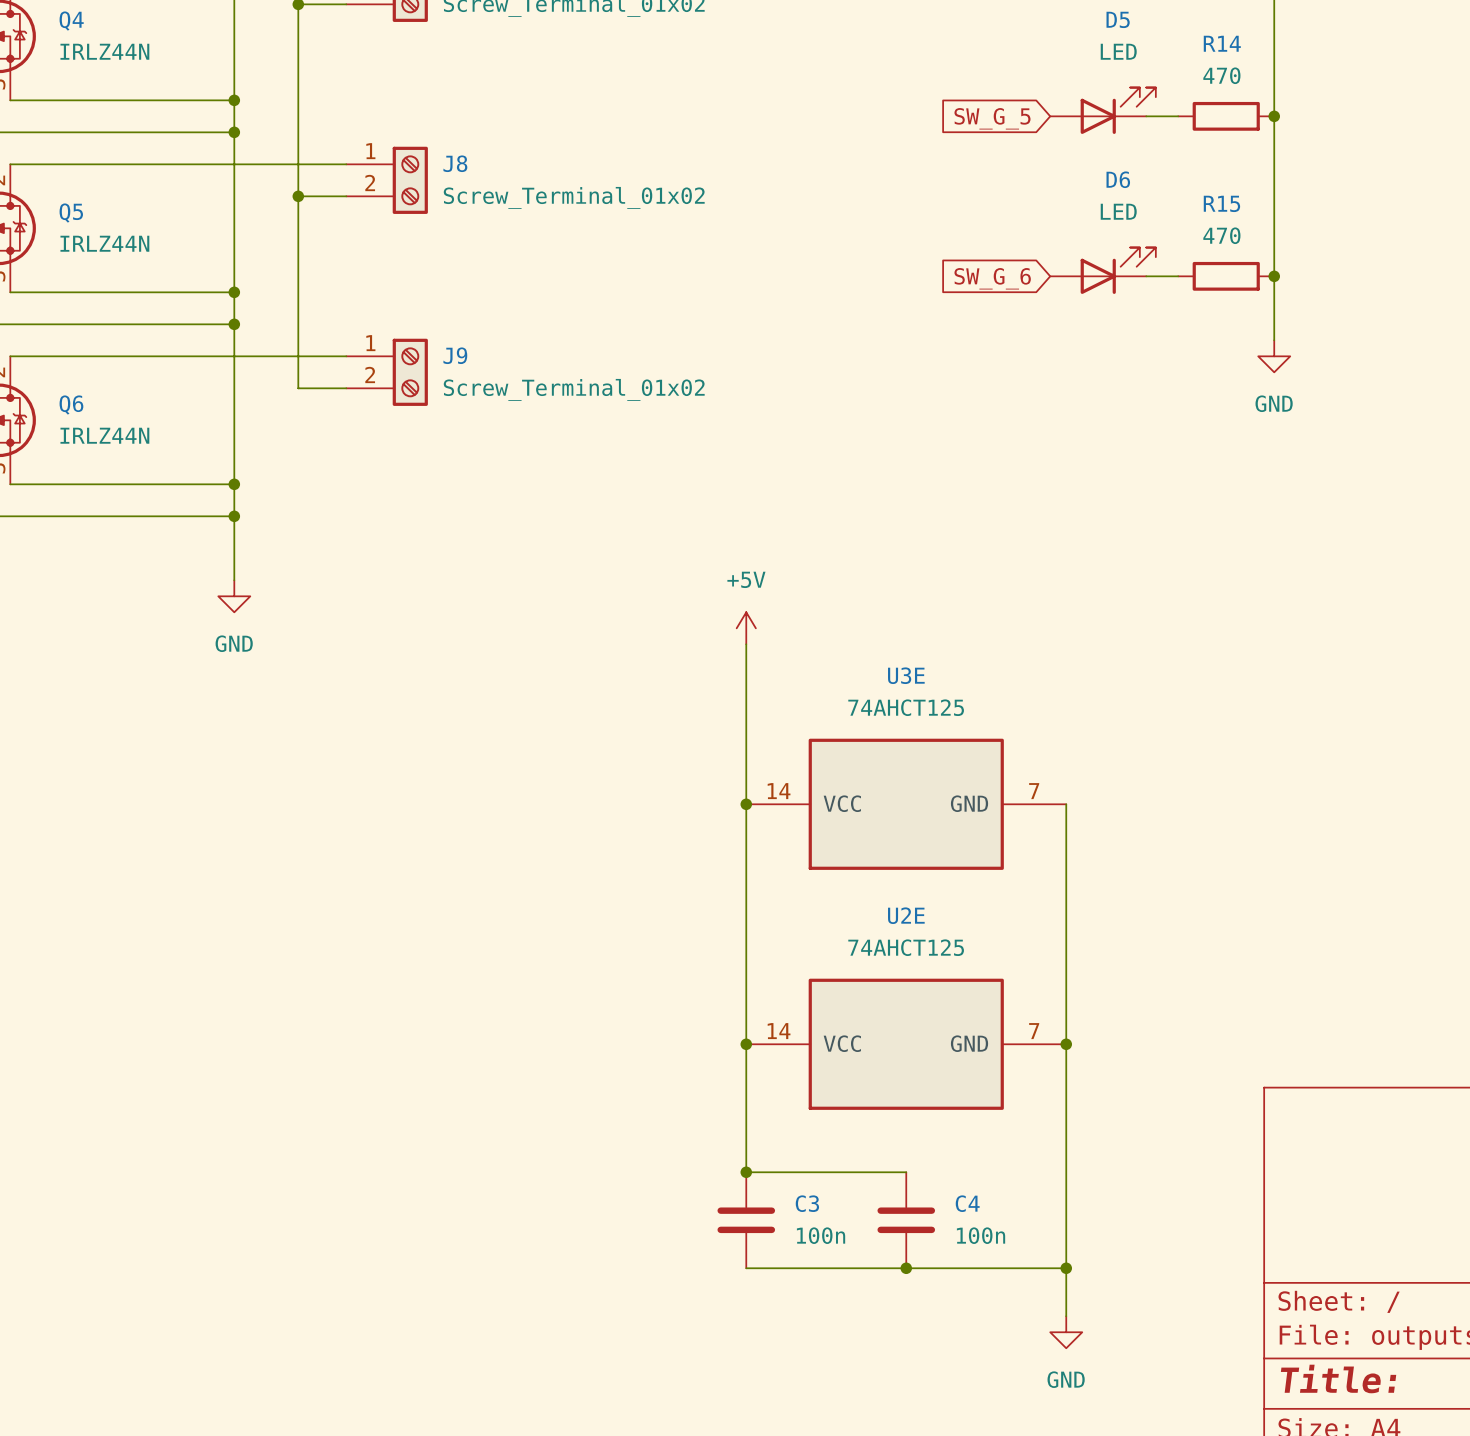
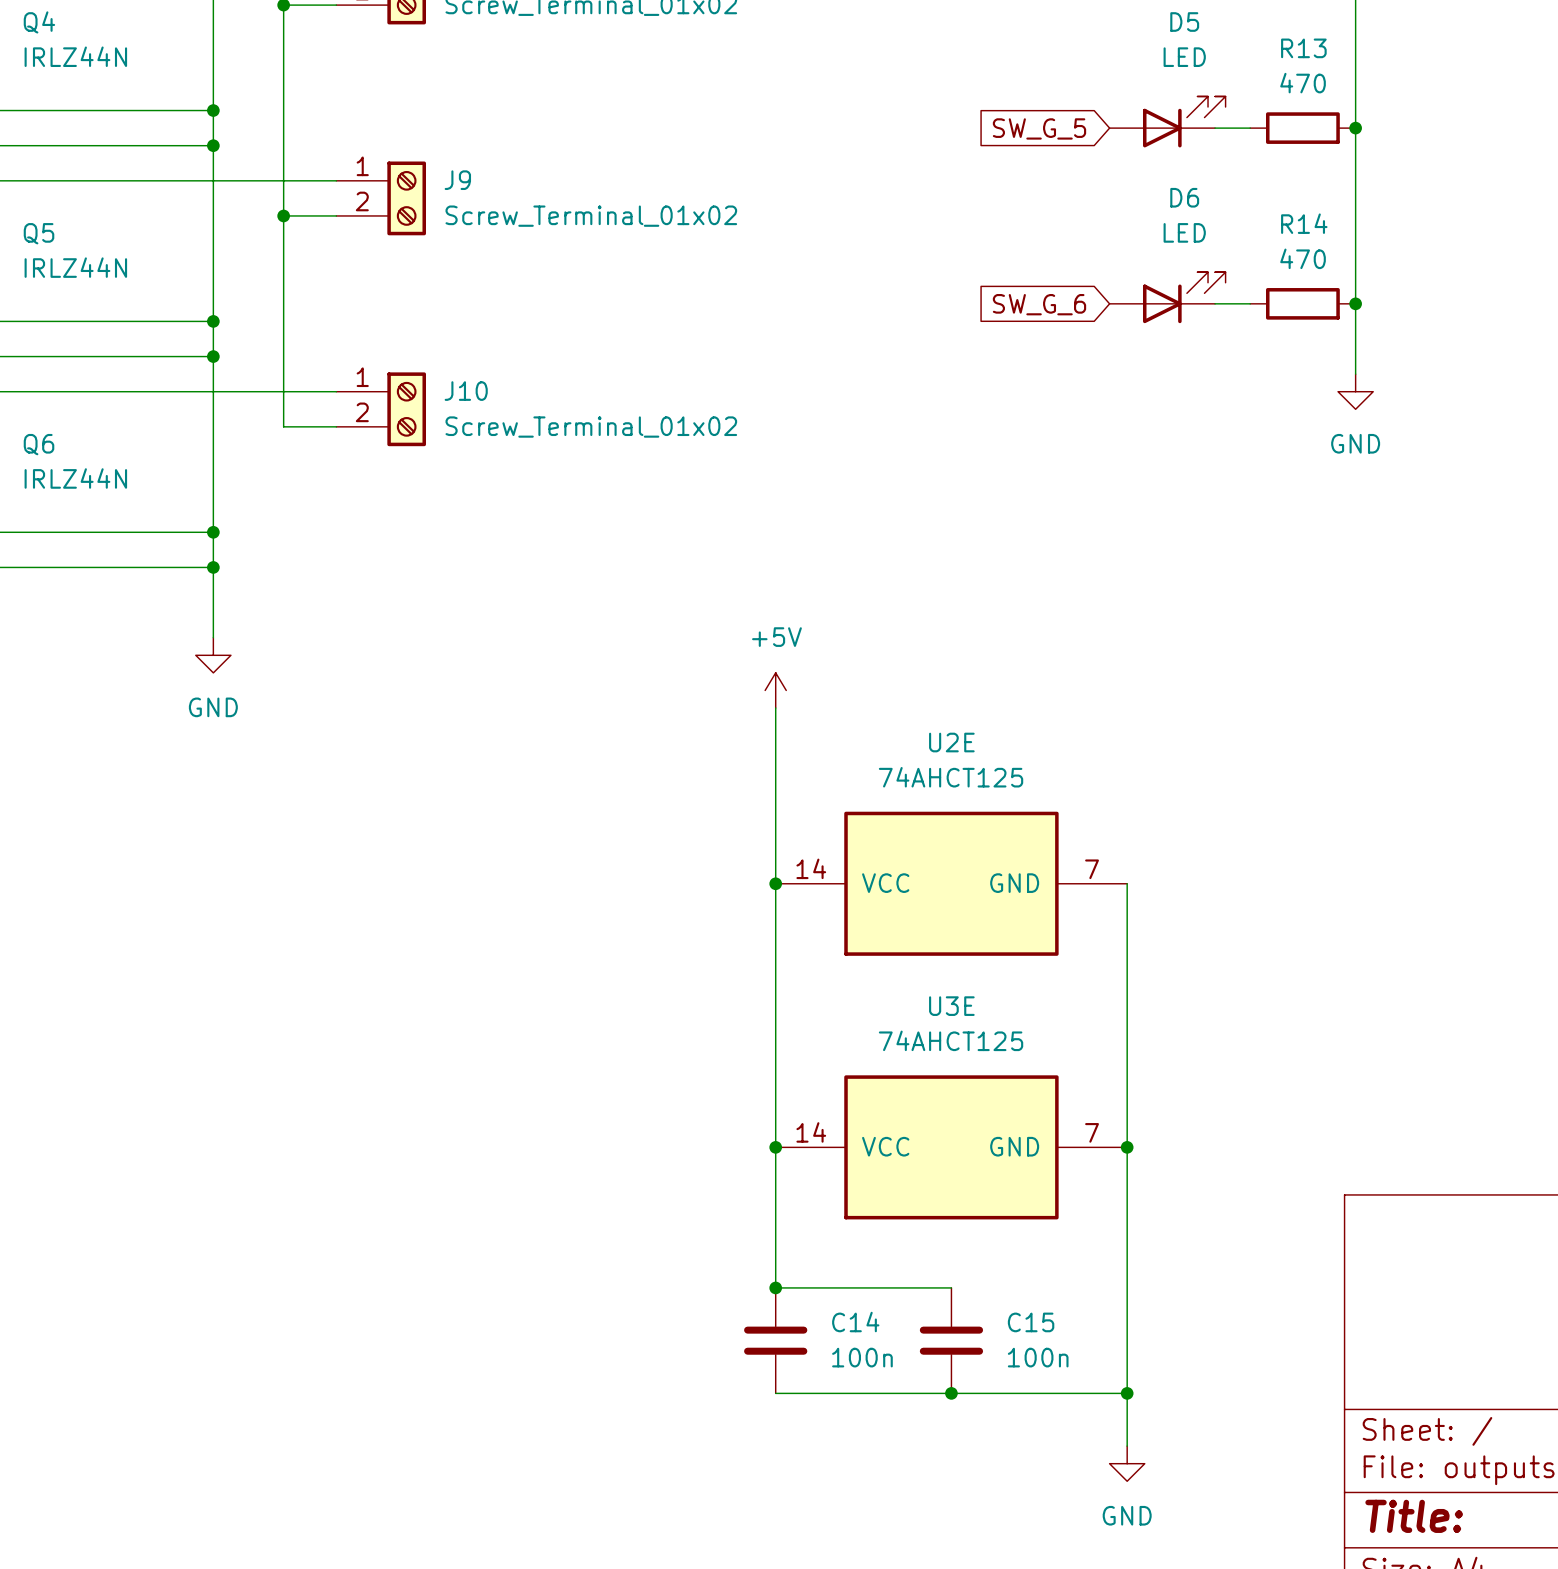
R14 name: R14 (1222, 43) -> R13 (1303, 48)
J8 name: J8 (455, 163) -> J9 (457, 180)
R15 name: R15 (1221, 203) -> R14 (1304, 223)
J9 name: J9 (455, 355) -> J10 (466, 391)
U3E name: U3E (906, 675) -> U2E (951, 742)
U2E name: U2E (906, 915) -> U3E (951, 1006)
C3 name: C3 (807, 1203) -> C14 (855, 1322)
C4 name: C4 (967, 1203) -> C15 (1031, 1322)

